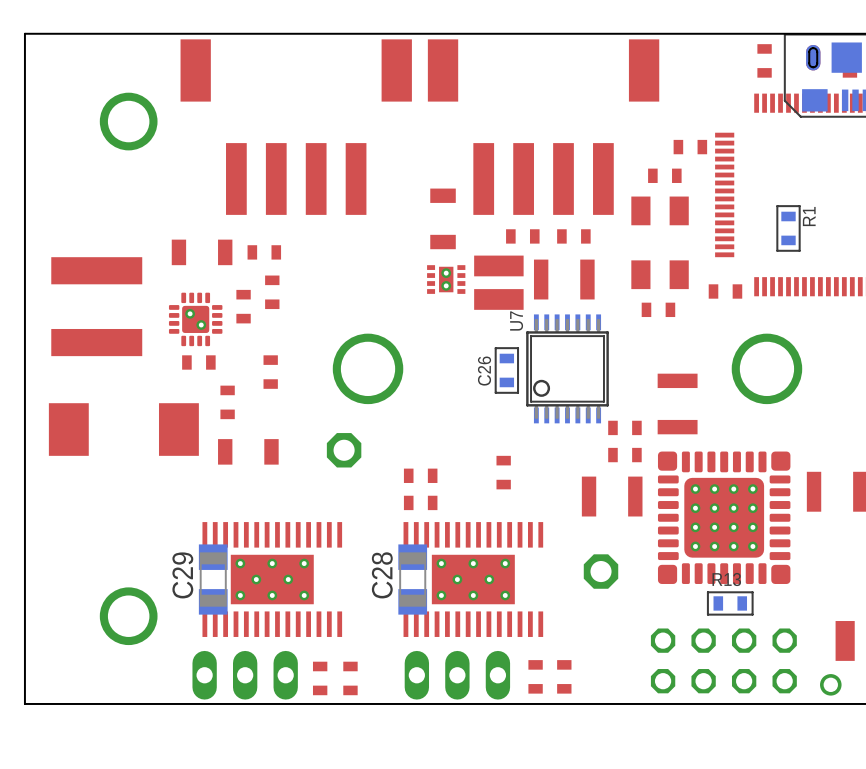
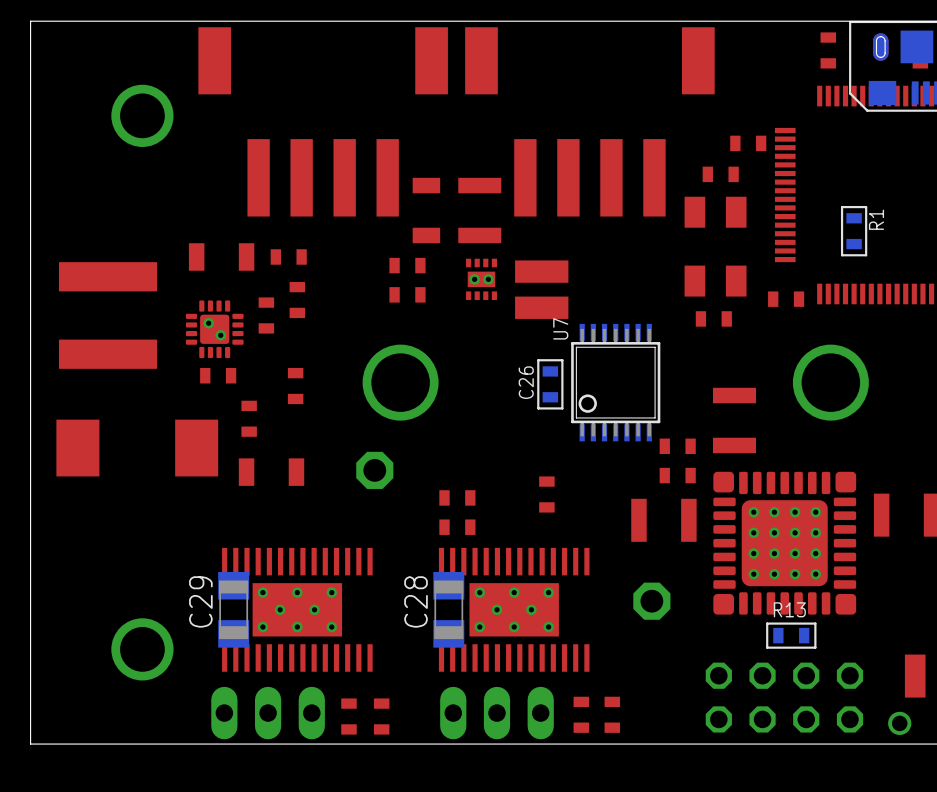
part footprint: [430, 188, 456, 250] -> [458, 177, 502, 244]
part: none -> (426, 210)
part: (522, 236) -> none
part: (573, 236) -> none
part: none -> (407, 265)
part rotation: 0° (446, 279) -> 90° clockwise (481, 279)
part: (564, 279) -> none
part: none -> (407, 294)

